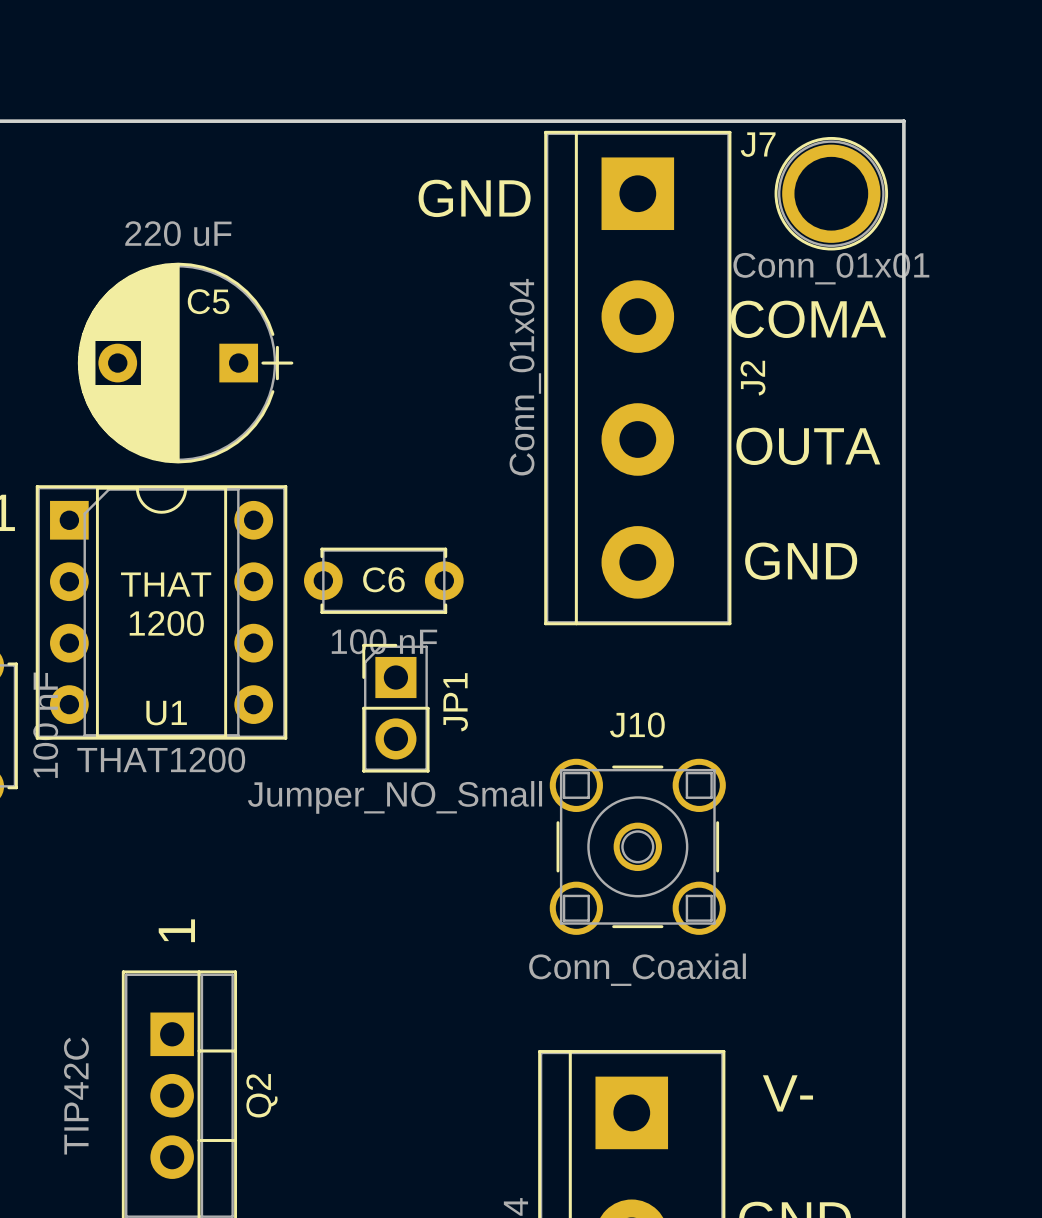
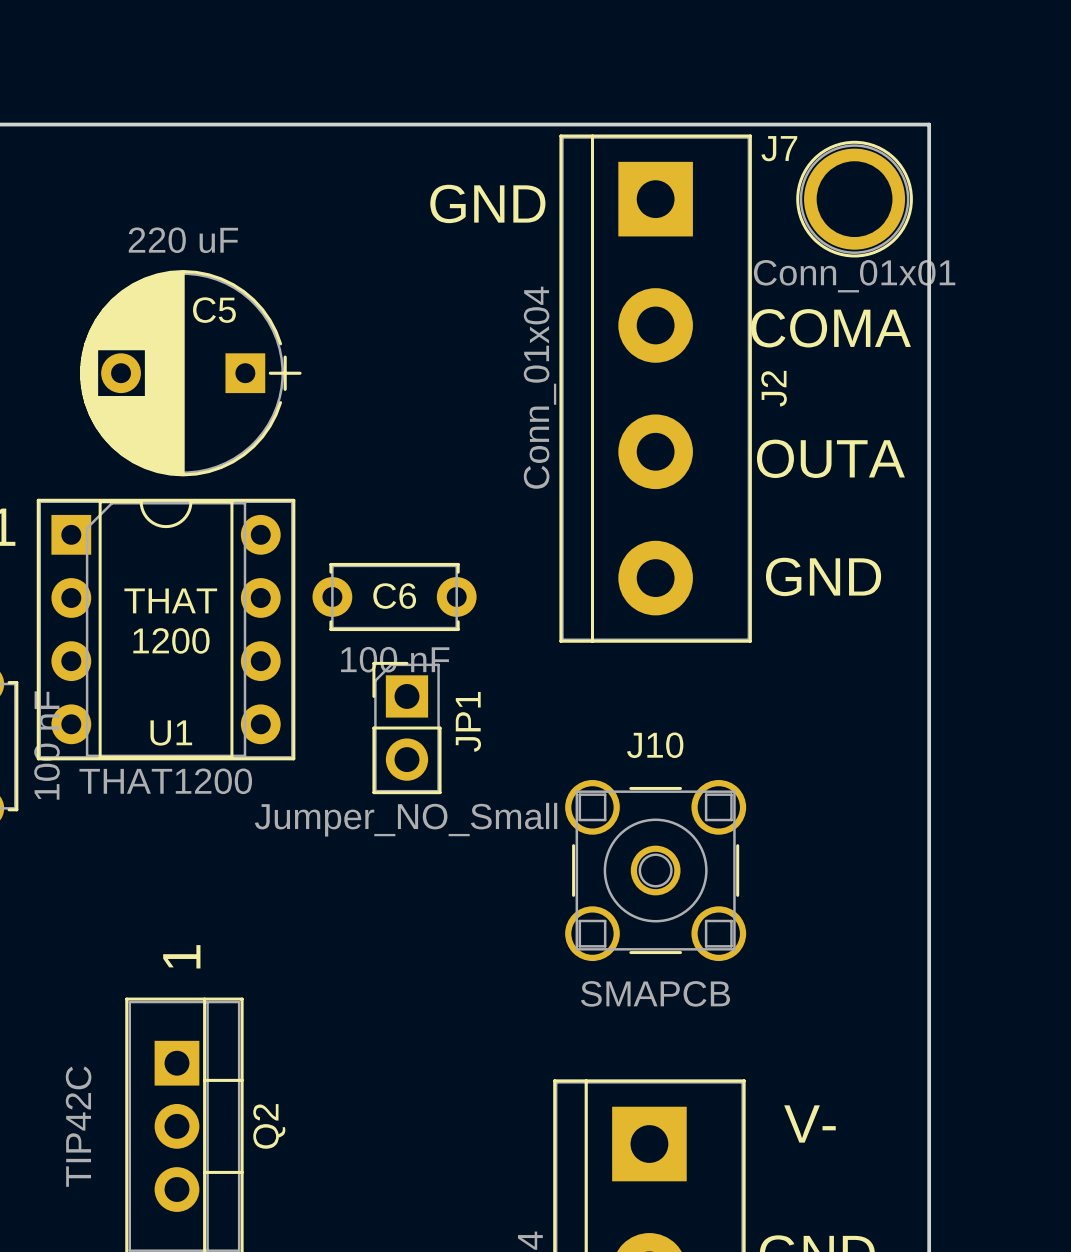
J10 value: Conn_Coaxial (637, 969) -> SMAPCB (655, 993)

